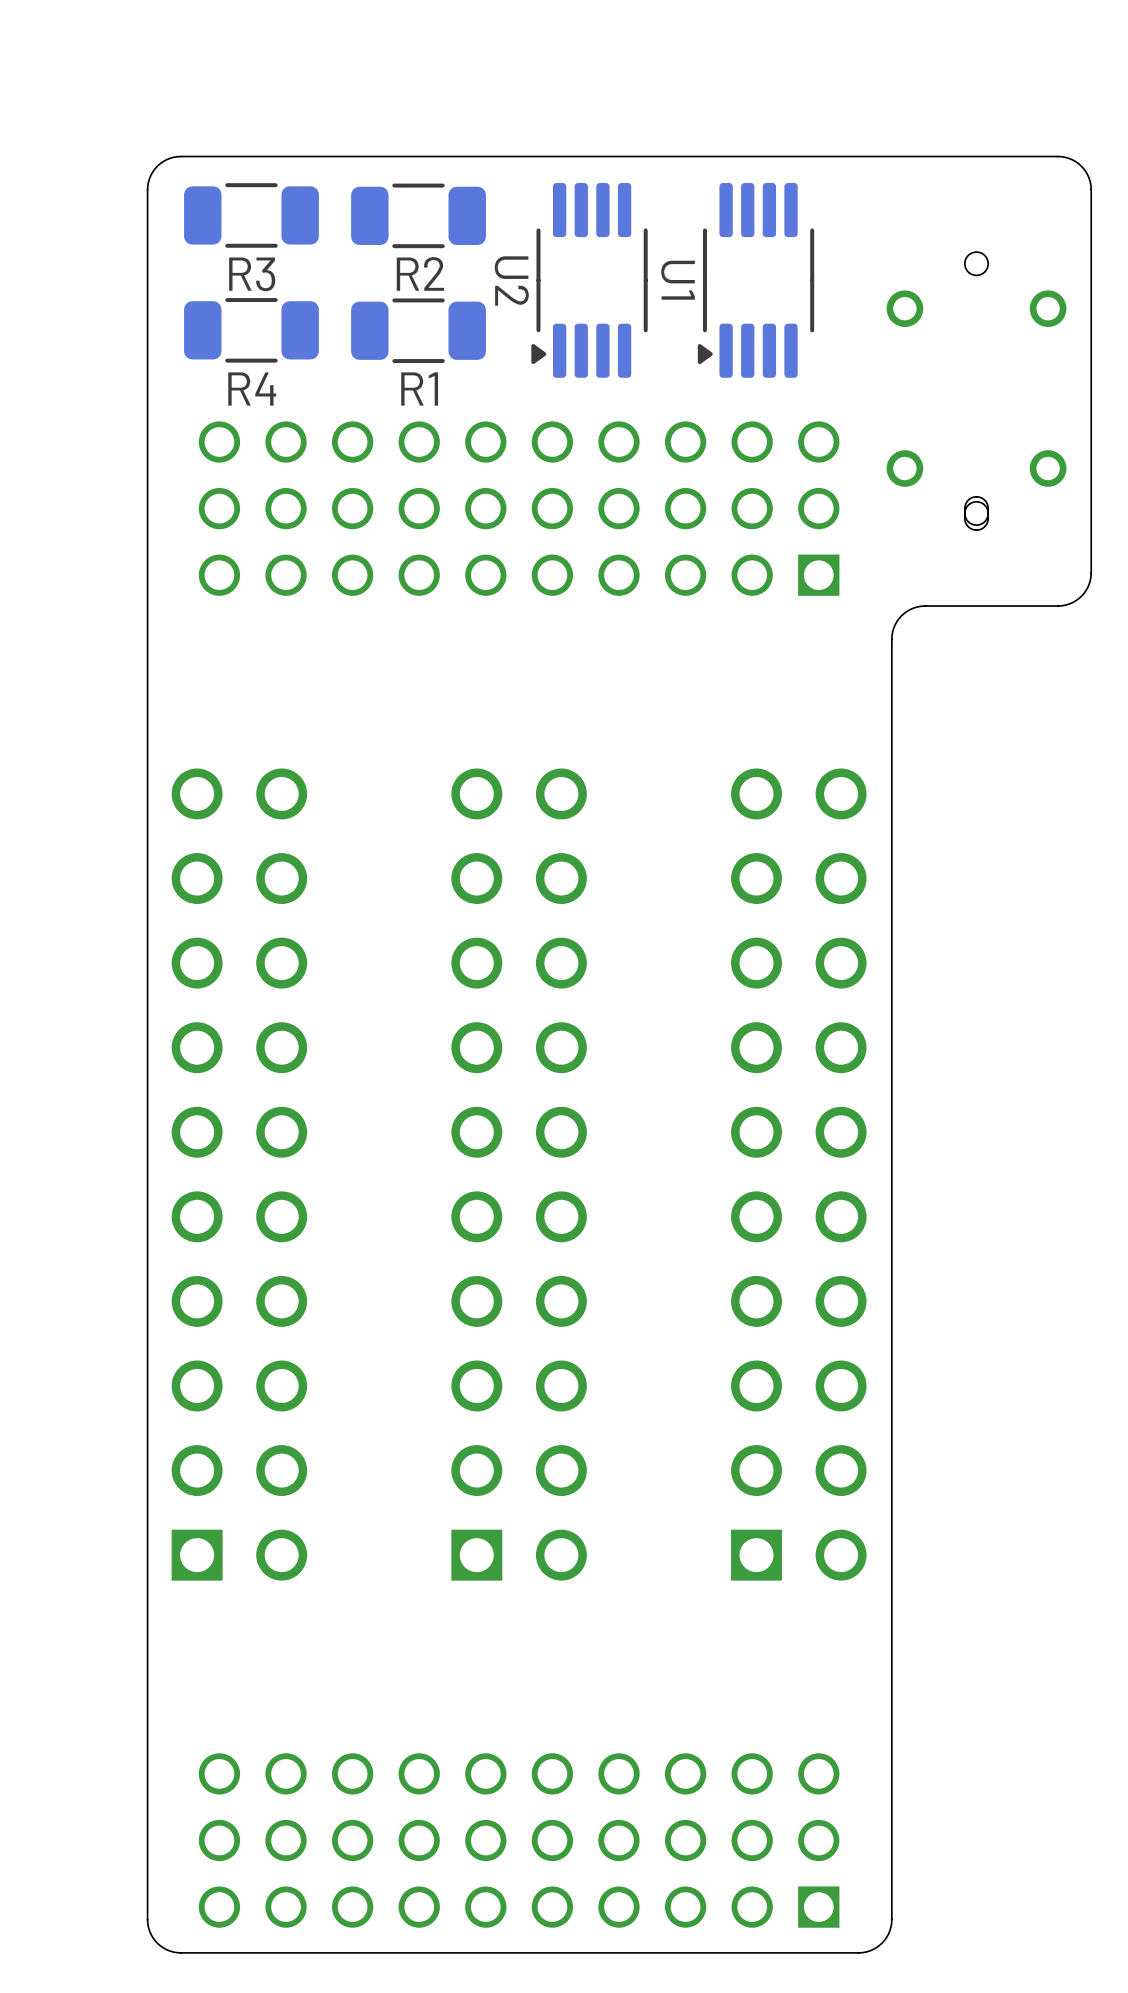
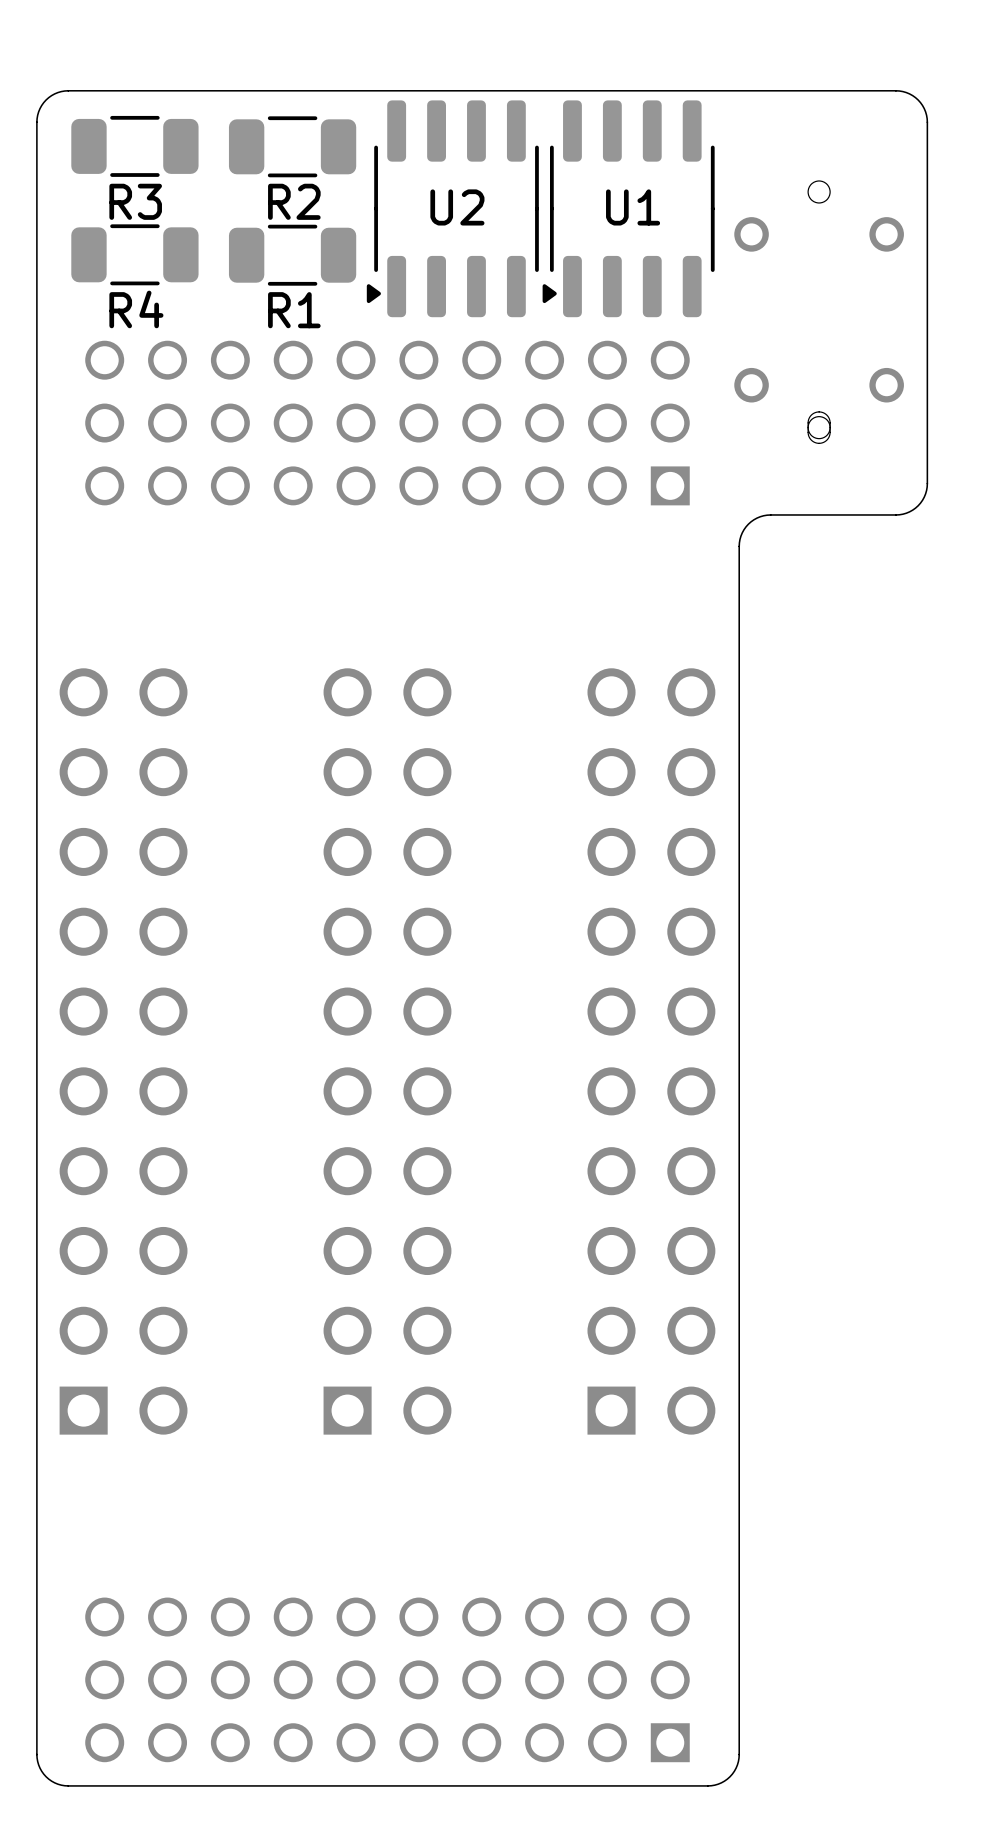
U2 footprint: [531, 182, 648, 378] -> [366, 100, 539, 318]
U1 footprint: [697, 182, 815, 378] -> [542, 100, 715, 318]
U1 name position: U1 (678, 280) -> U1 (633, 207)
U2 name position: U2 (511, 281) -> U2 (457, 207)

